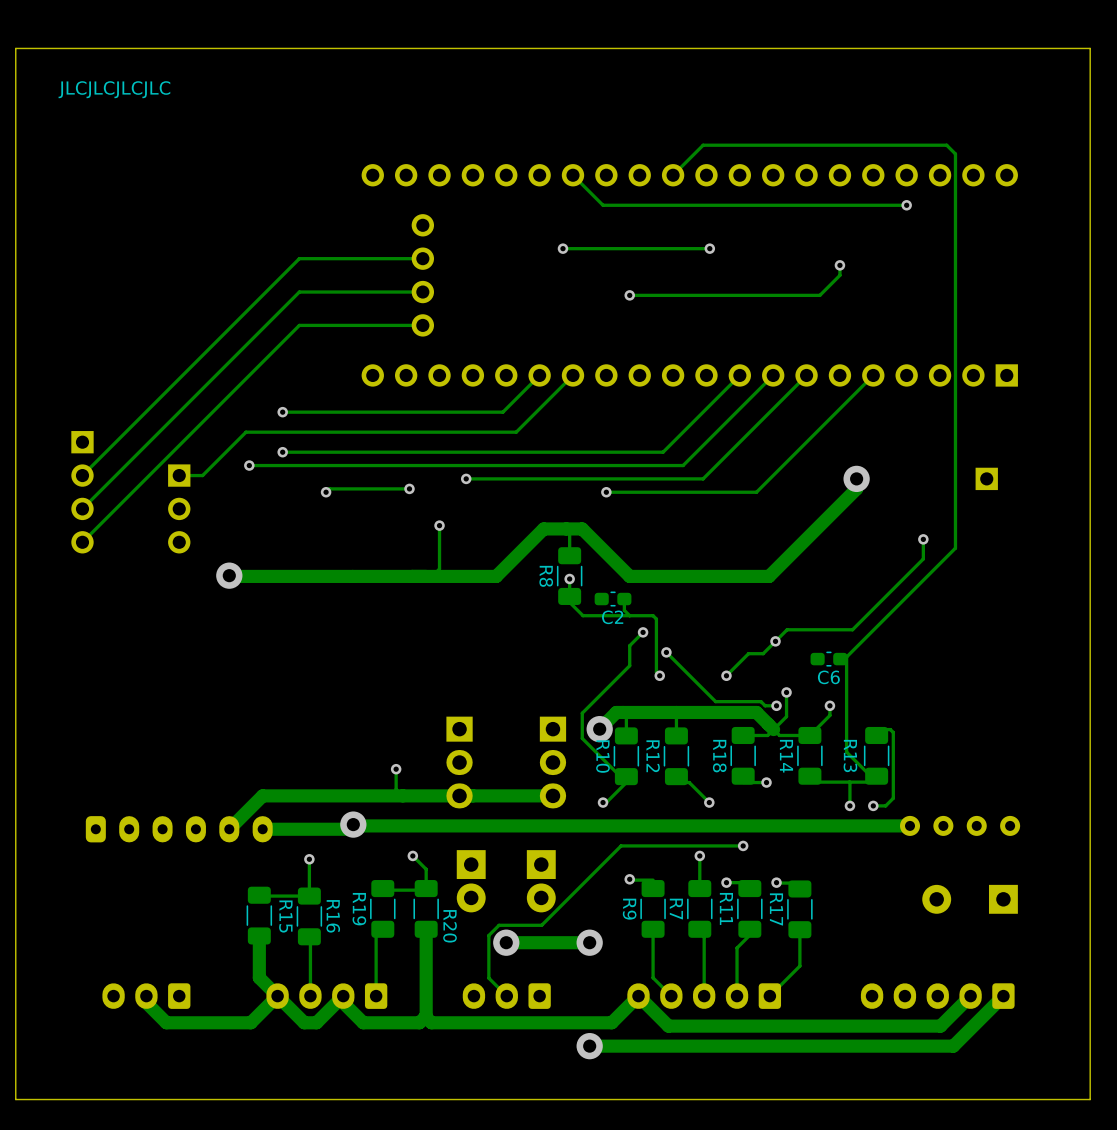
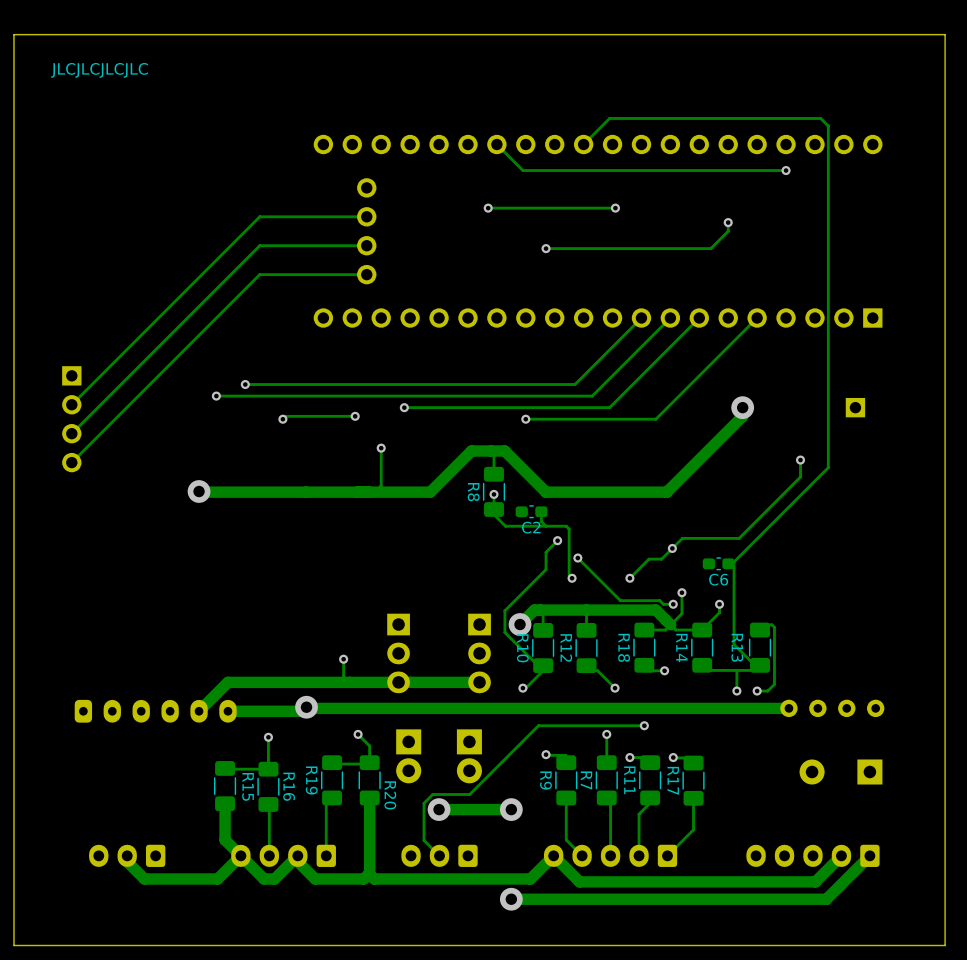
track: (539, 375) (502, 412) (282, 412) -> none
track: (572, 375) (516, 432) (245, 432) (202, 475) (179, 475) -> none
via: (282, 412) -> none
part: (179, 508) -> none

